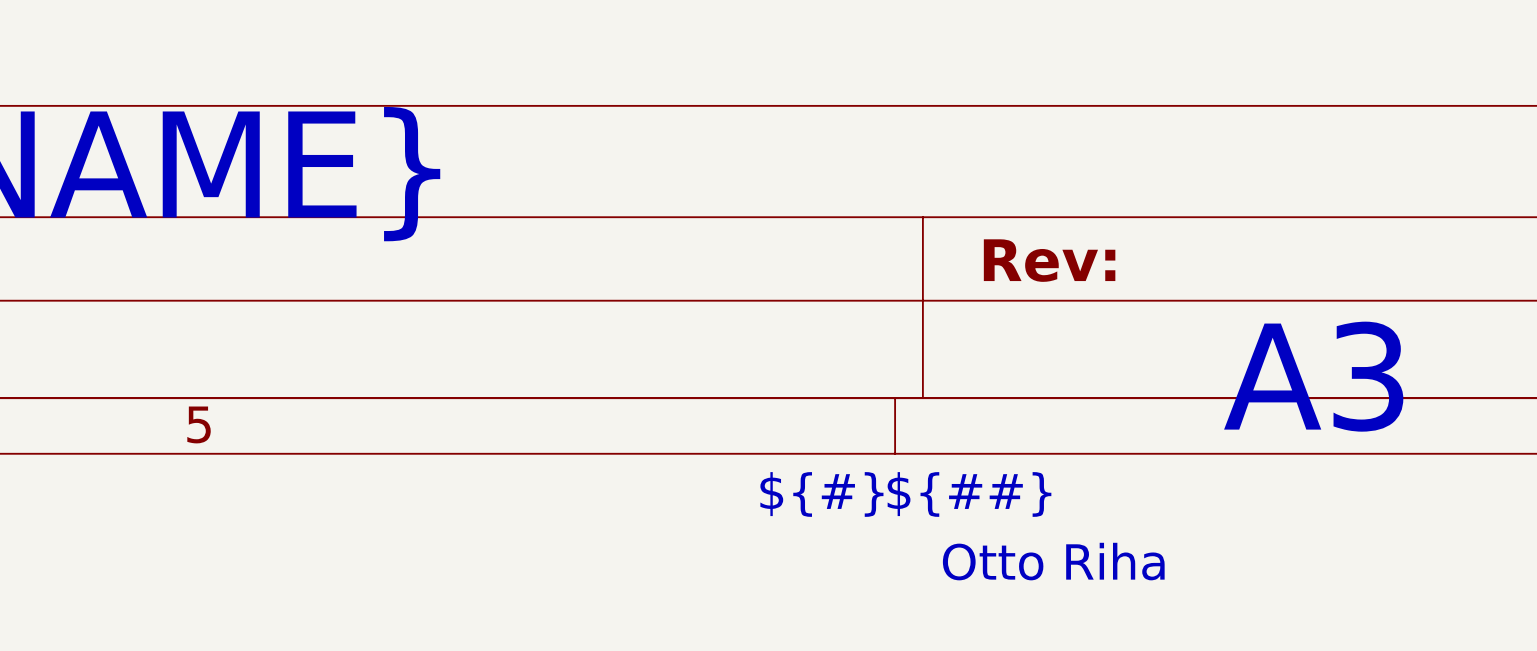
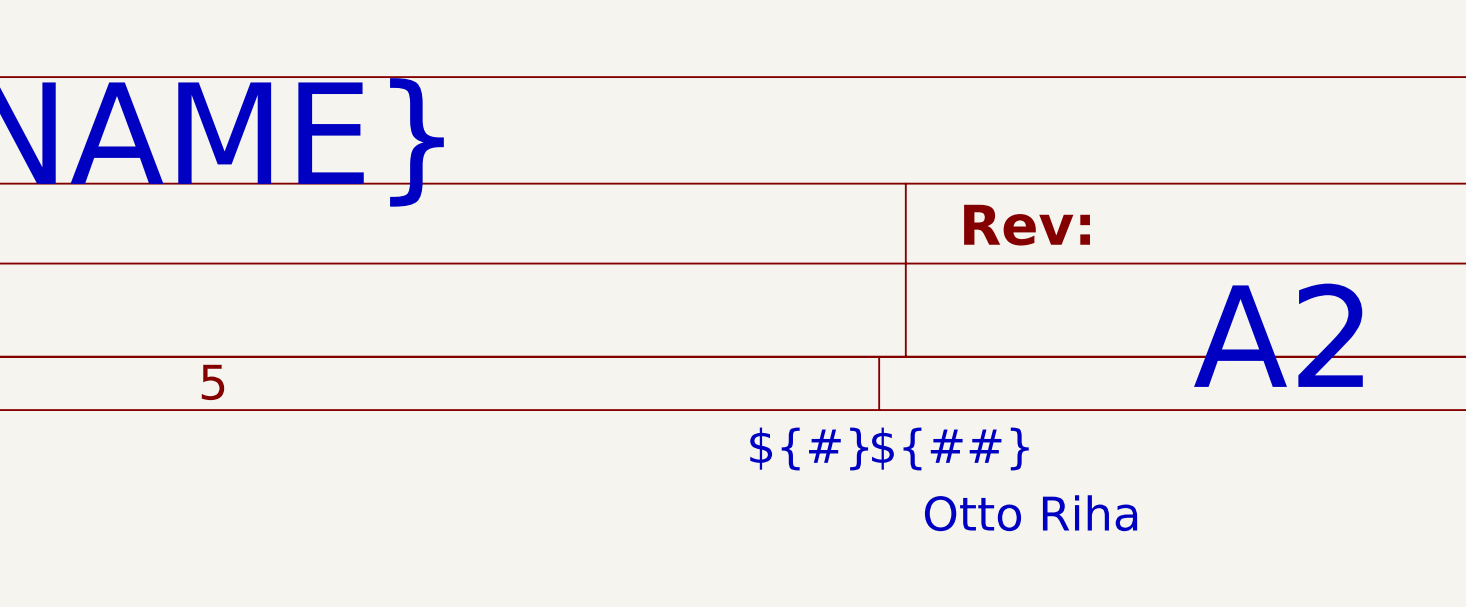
text: A3 (1313, 376) -> A2 (1278, 335)

